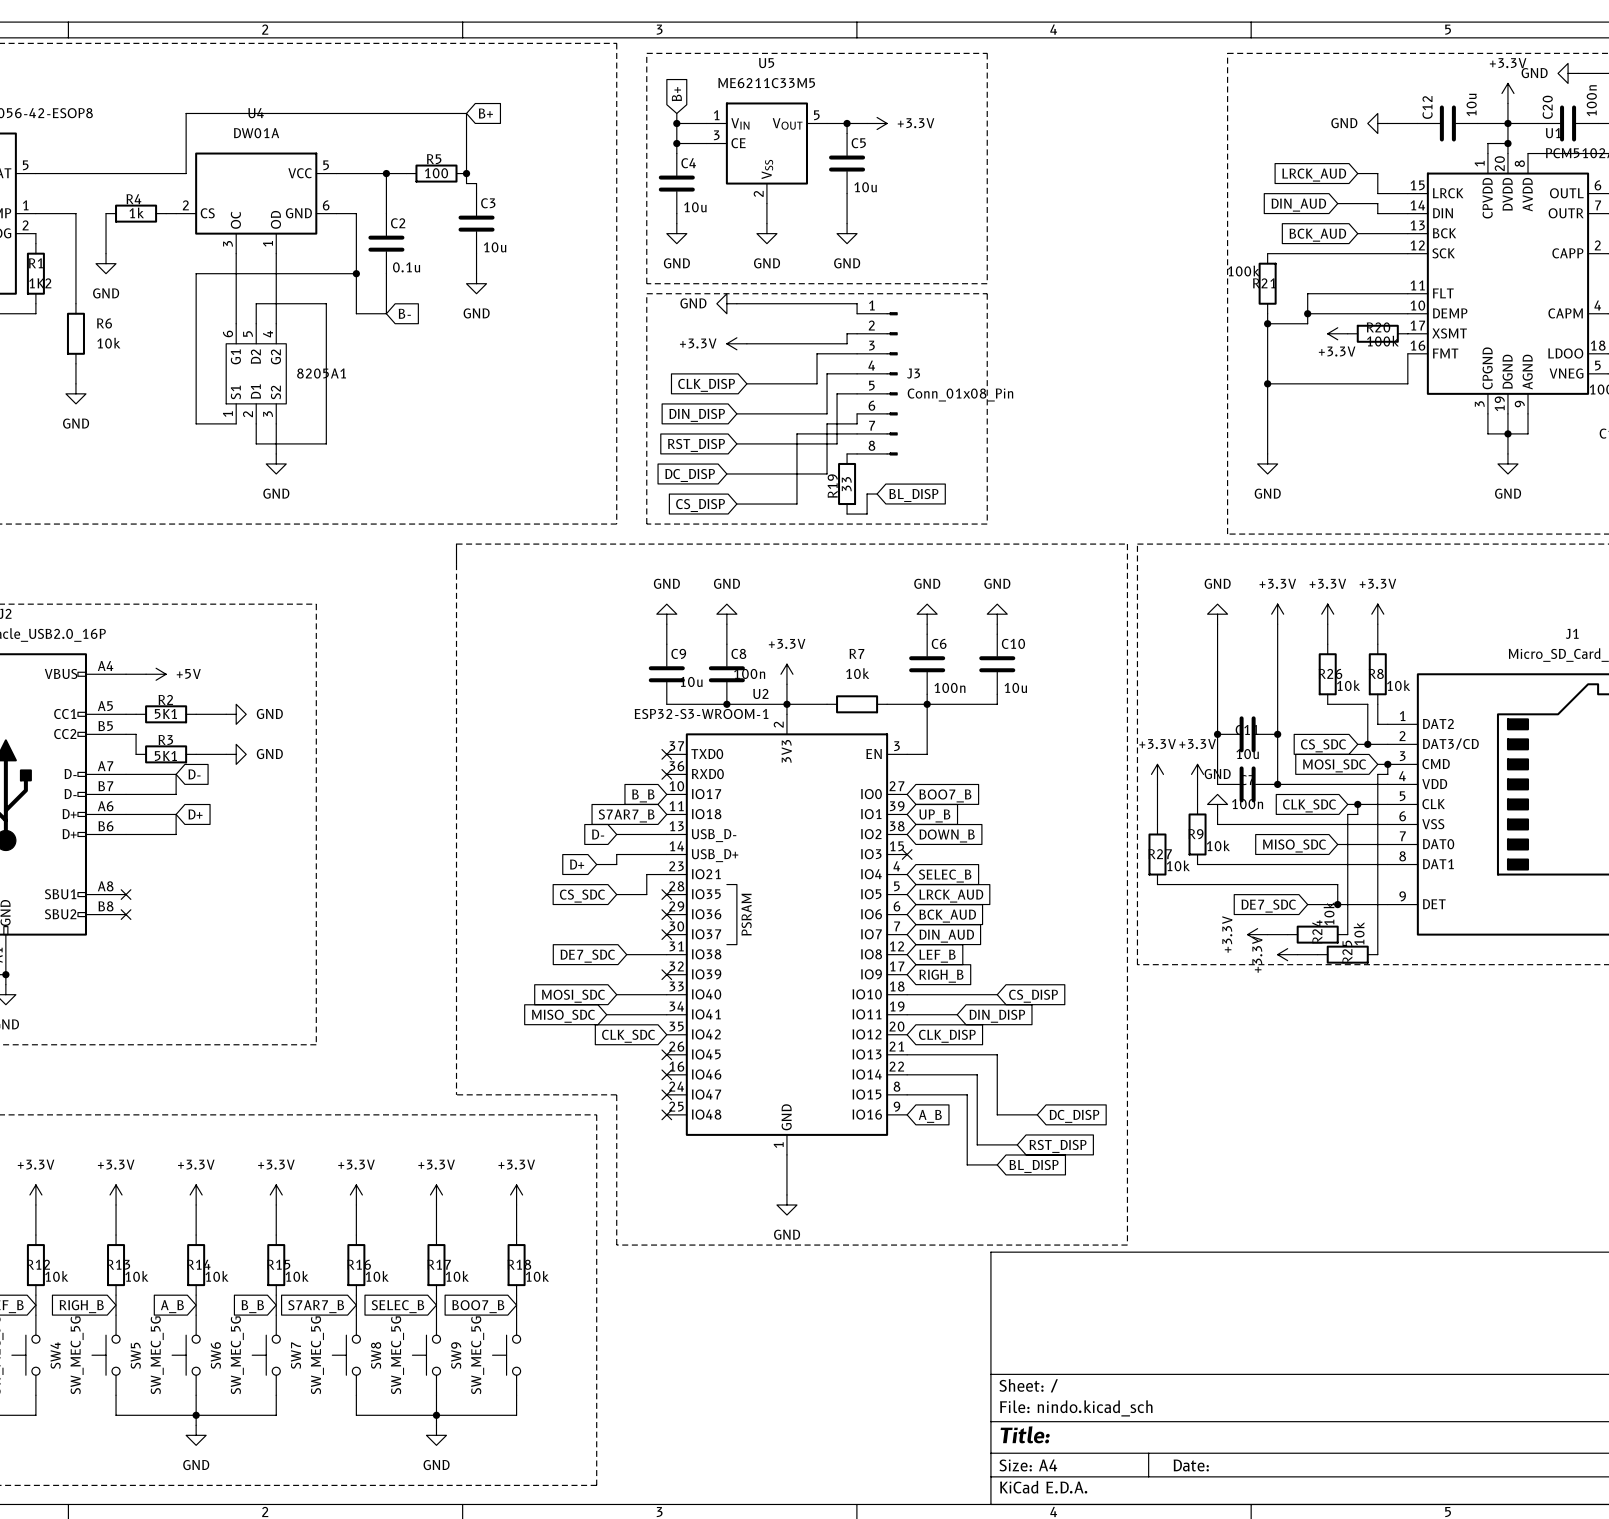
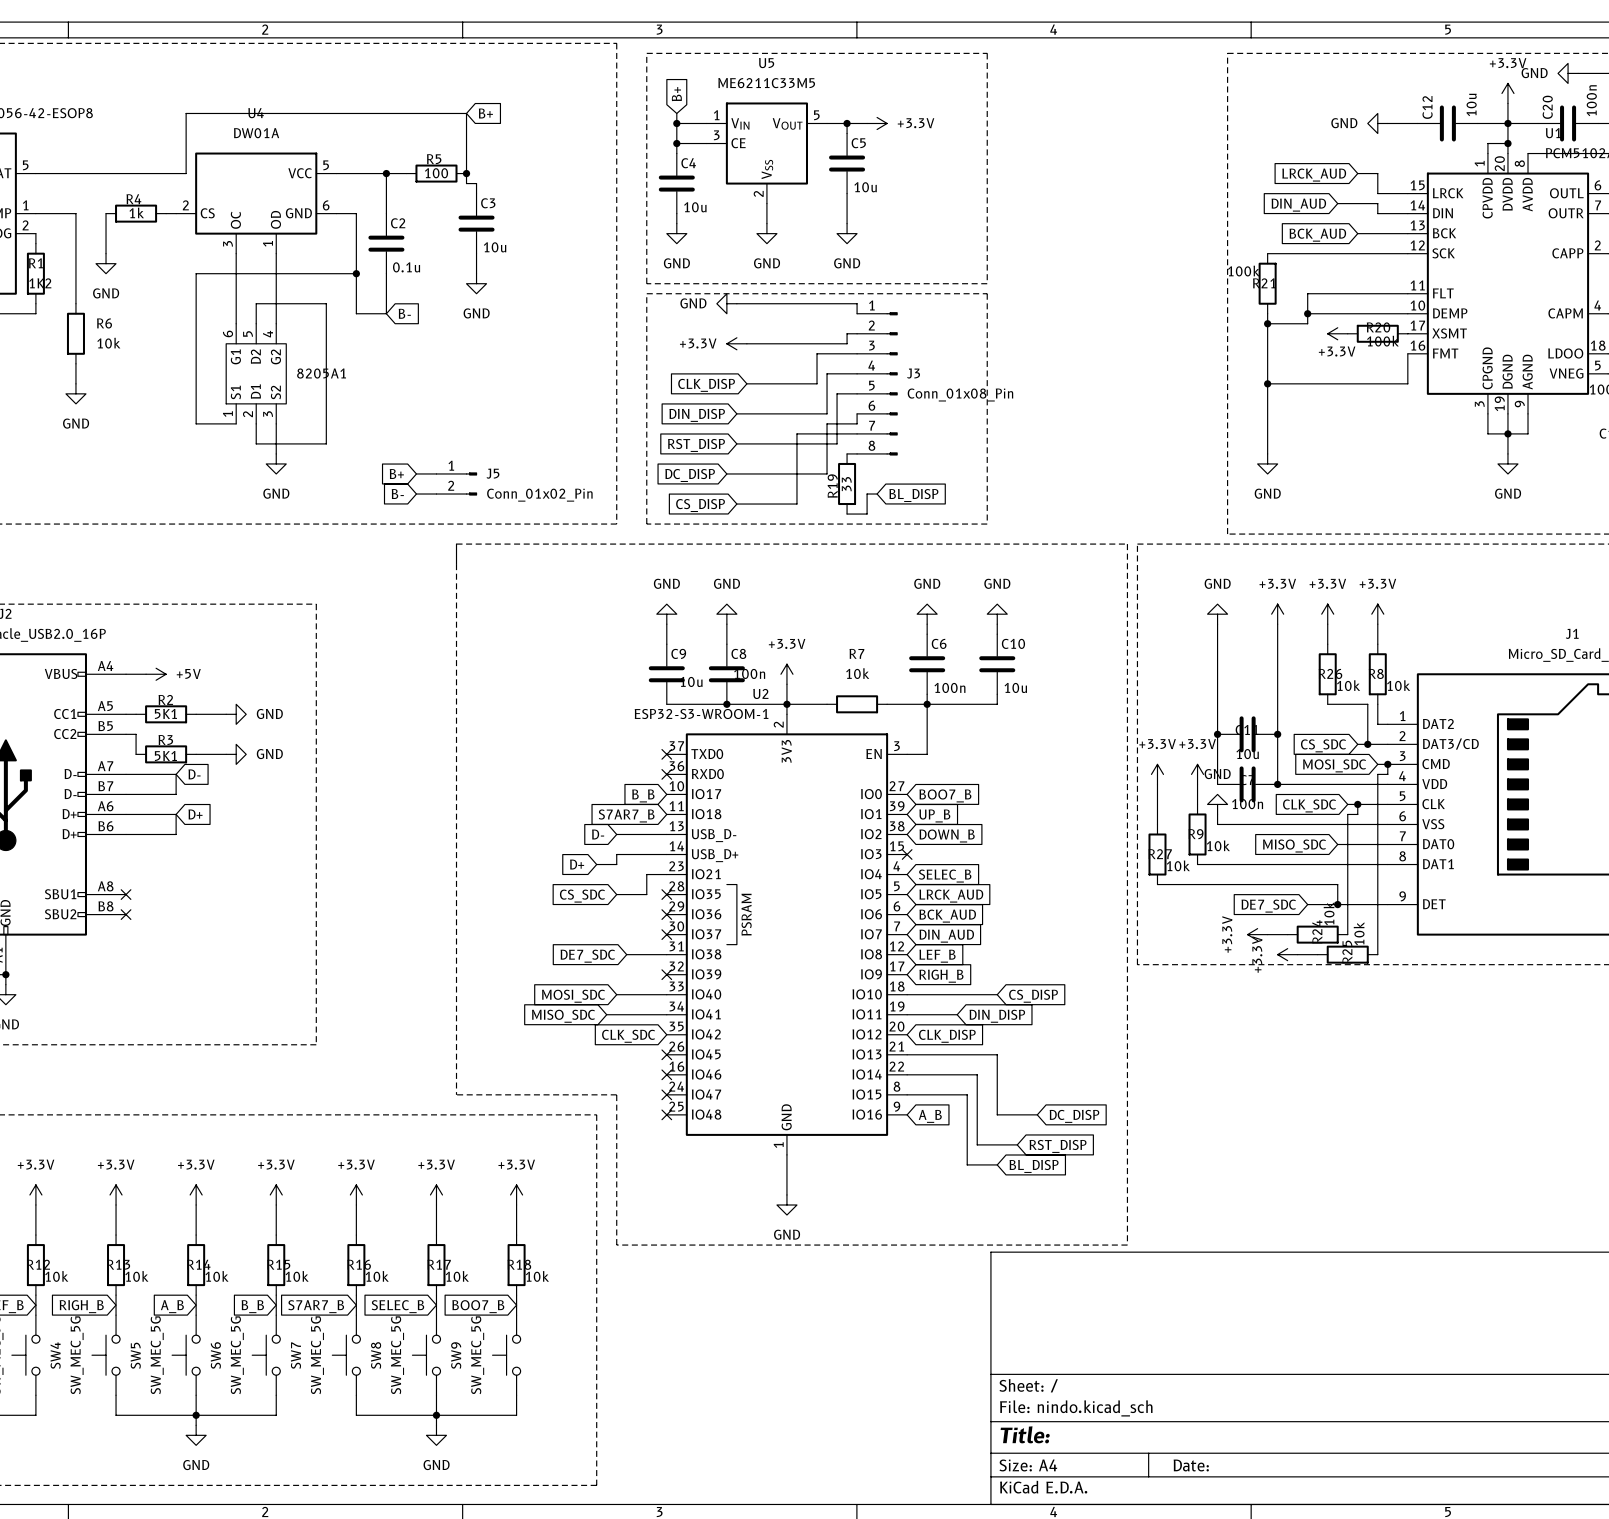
wire: none -> (416, 473) (436, 473)
global label: none -> B+ (396, 474)
J5: none -> Conn_01x02_Pin (456, 483)
global label: none -> B- (397, 494)
wire: none -> (416, 494) (436, 494)

